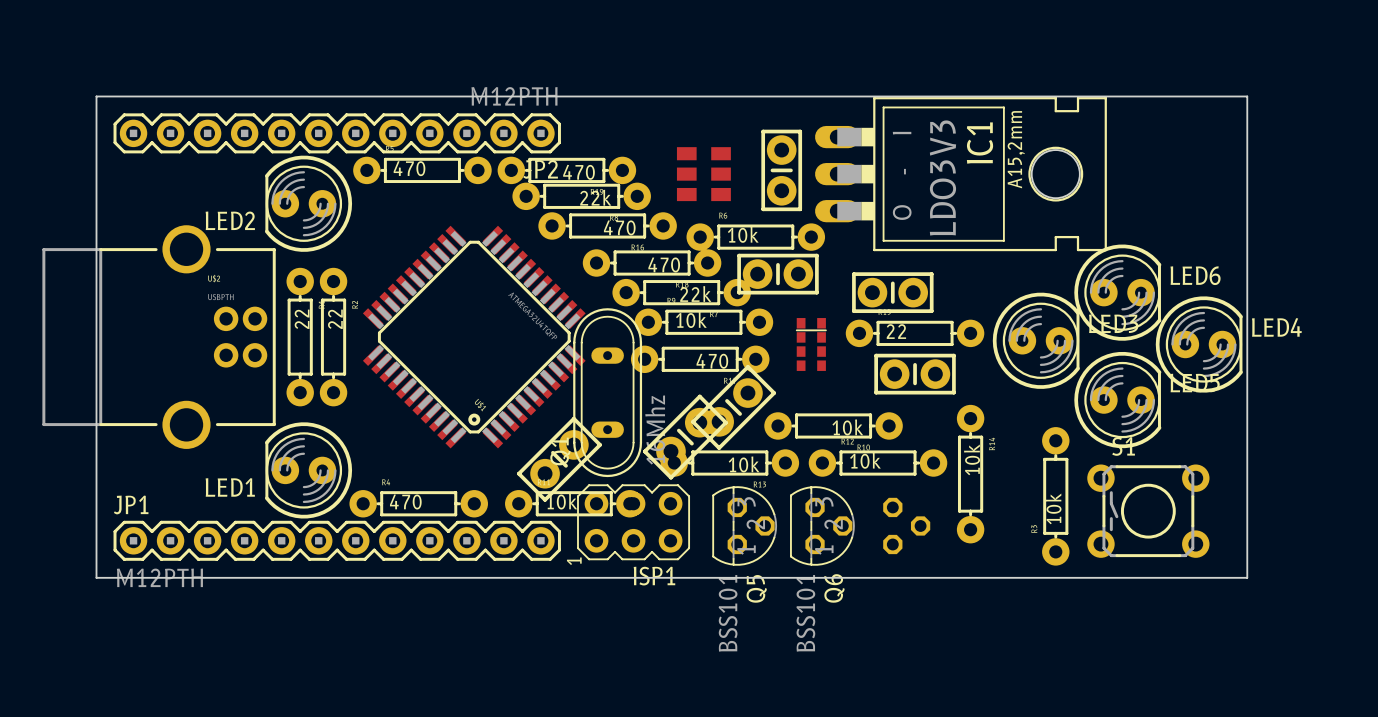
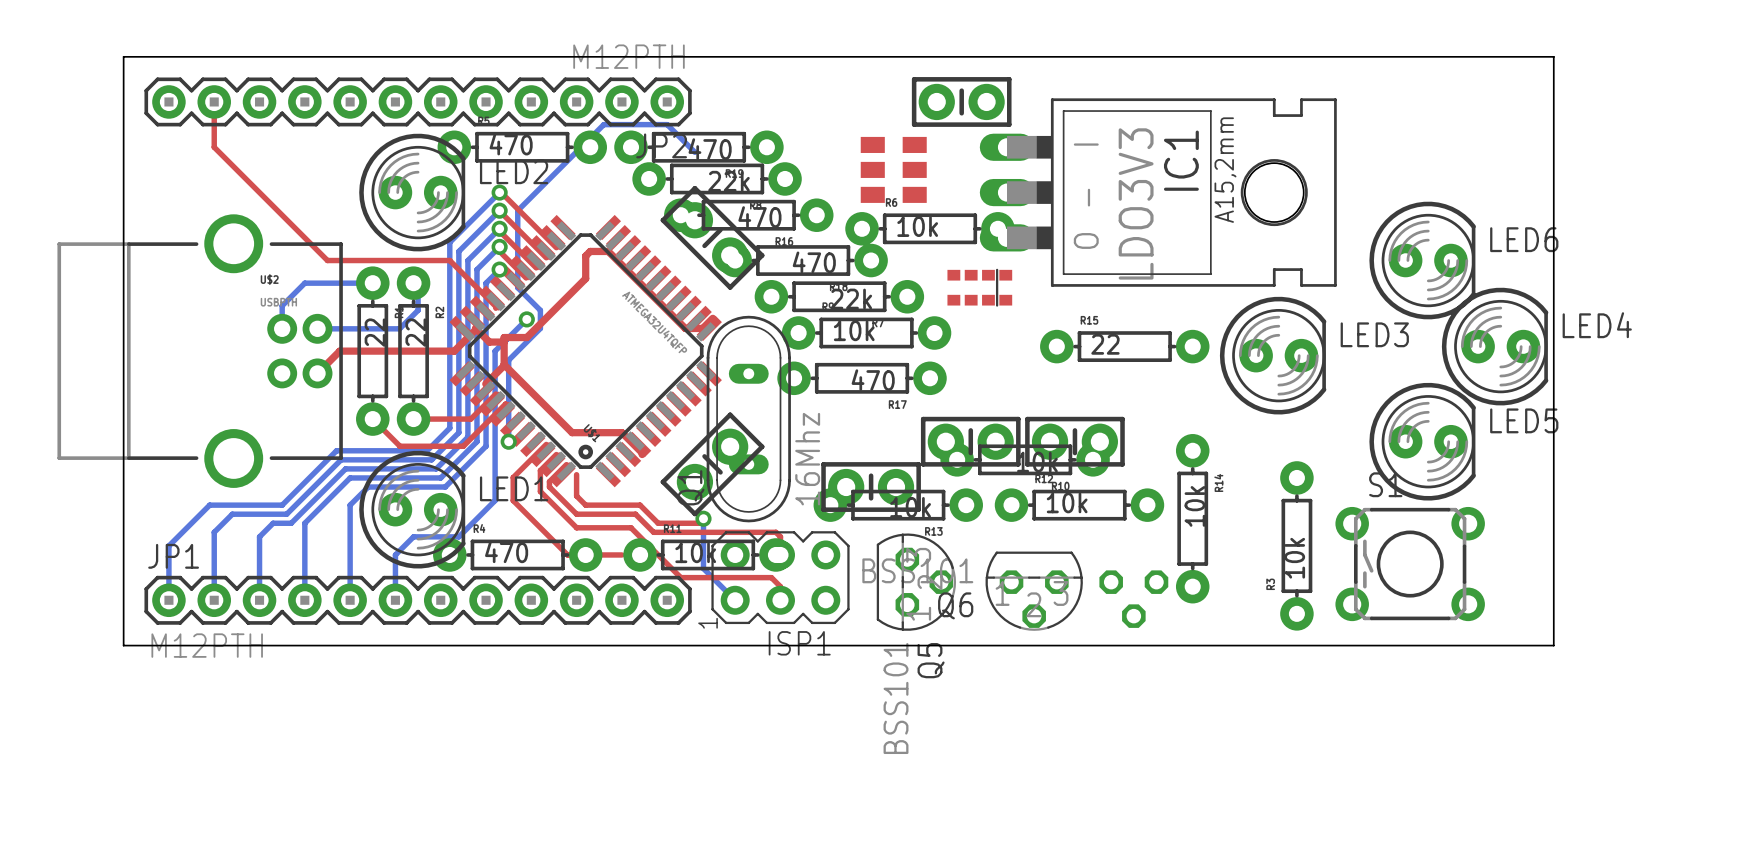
board edge: (1247, 96) (1247, 577) -> (1531, 56) (1553, 56) (1553, 645) (1531, 645)
top track: none -> (214, 101) (214, 147) (327, 260) (449, 260) (495, 308)
part rotation: 0° (781, 170) -> 90° clockwise (961, 101)
bottom track: none -> (694, 152) (667, 124) (603, 124) (517, 210) (517, 287) (540, 310) (540, 328) (508, 360) (508, 441)
part position: (703, 174) -> (893, 169)
IC1 position: (960, 174) -> (1158, 192)
LED2 rotation: 0° (308, 203) -> 180° (412, 192)
top track: none -> (499, 192) (556, 247)
bottom track: none -> (499, 192) (449, 242) (449, 428) (427, 450) (336, 450) (282, 505) (209, 505) (168, 545) (168, 600)
via: none -> (499, 192)
top track: none -> (499, 210) (546, 257)
bottom track: none -> (499, 210) (458, 251) (458, 432) (431, 459) (341, 459) (286, 514) (232, 514) (214, 532) (214, 600)
via: none -> (499, 210)
top track: none -> (499, 228) (499, 231) (536, 267)
bottom track: none -> (499, 228) (467, 260) (467, 437) (436, 468) (345, 468) (291, 523) (273, 523) (259, 536) (259, 600)
via: none -> (499, 228)
part: none -> (712, 237)
top track: none -> (499, 246) (499, 251) (526, 277)
bottom track: none -> (499, 246) (476, 269) (476, 441) (440, 477) (350, 477) (304, 523) (304, 600)
via: none -> (499, 246)
bottom track: none -> (499, 269) (486, 283) (486, 446) (445, 487) (368, 487) (350, 505) (350, 600)
via: none -> (499, 269)
part: (777, 274) -> none
bottom track: none -> (372, 283) (304, 283) (282, 305) (282, 328)
bottom track: none -> (418, 283) (418, 310) (399, 328) (317, 328)
part: (892, 292) -> none
LED6 position: (1117, 292) -> (1422, 260)
top track: none -> (712, 318) (702, 328) (685, 328) (608, 251) (590, 251) (585, 255) (585, 278) (526, 337) (504, 337) (504, 365) (485, 383)
bottom track: none -> (526, 319) (495, 351) (495, 500) (458, 536) (413, 536) (395, 554) (395, 600)
via: none -> (526, 319)
top track: none -> (504, 342) (489, 342) (475, 328) (454, 351) (339, 351) (317, 373)
part rotation: 0° (811, 344) -> 90° clockwise (979, 287)
part position: (811, 344) -> (979, 287)
LED4 position: (1199, 344) -> (1495, 346)
top track: none -> (504, 364) (572, 432) (621, 432) (642, 454)
top track: none -> (495, 394) (470, 419) (418, 419)
part position: (915, 374) -> (1074, 441)
top track: none -> (505, 404) (463, 446) (399, 446) (372, 419)
LED5 position: (1117, 400) -> (1422, 441)
part: (733, 407) -> none
via: none -> (508, 441)
part: none -> (970, 441)
top track: none -> (546, 444) (513, 477) (513, 500) (567, 554) (621, 554)
top track: none -> (556, 454) (540, 470) (540, 491) (576, 527) (631, 527) (680, 577) (771, 577) (780, 586) (780, 600)
top track: none -> (566, 464) (549, 481) (549, 487) (576, 514) (635, 514) (653, 532) (775, 532) (780, 536) (780, 554)
part: (685, 437) -> none
top track: none -> (576, 474) (576, 496) (585, 505) (640, 505) (658, 523) (698, 523) (703, 518)
part: none -> (871, 487)
part position: (559, 459) -> (712, 464)
LED1 rotation: 0° (308, 470) -> 180° (412, 509)
bottom track: none -> (703, 518) (703, 568) (735, 600)
via: none -> (703, 518)
Q6 rotation: 0° (822, 525) -> 90° clockwise (1034, 591)
part rotation: 0° (906, 525) -> 90° clockwise (1133, 599)

